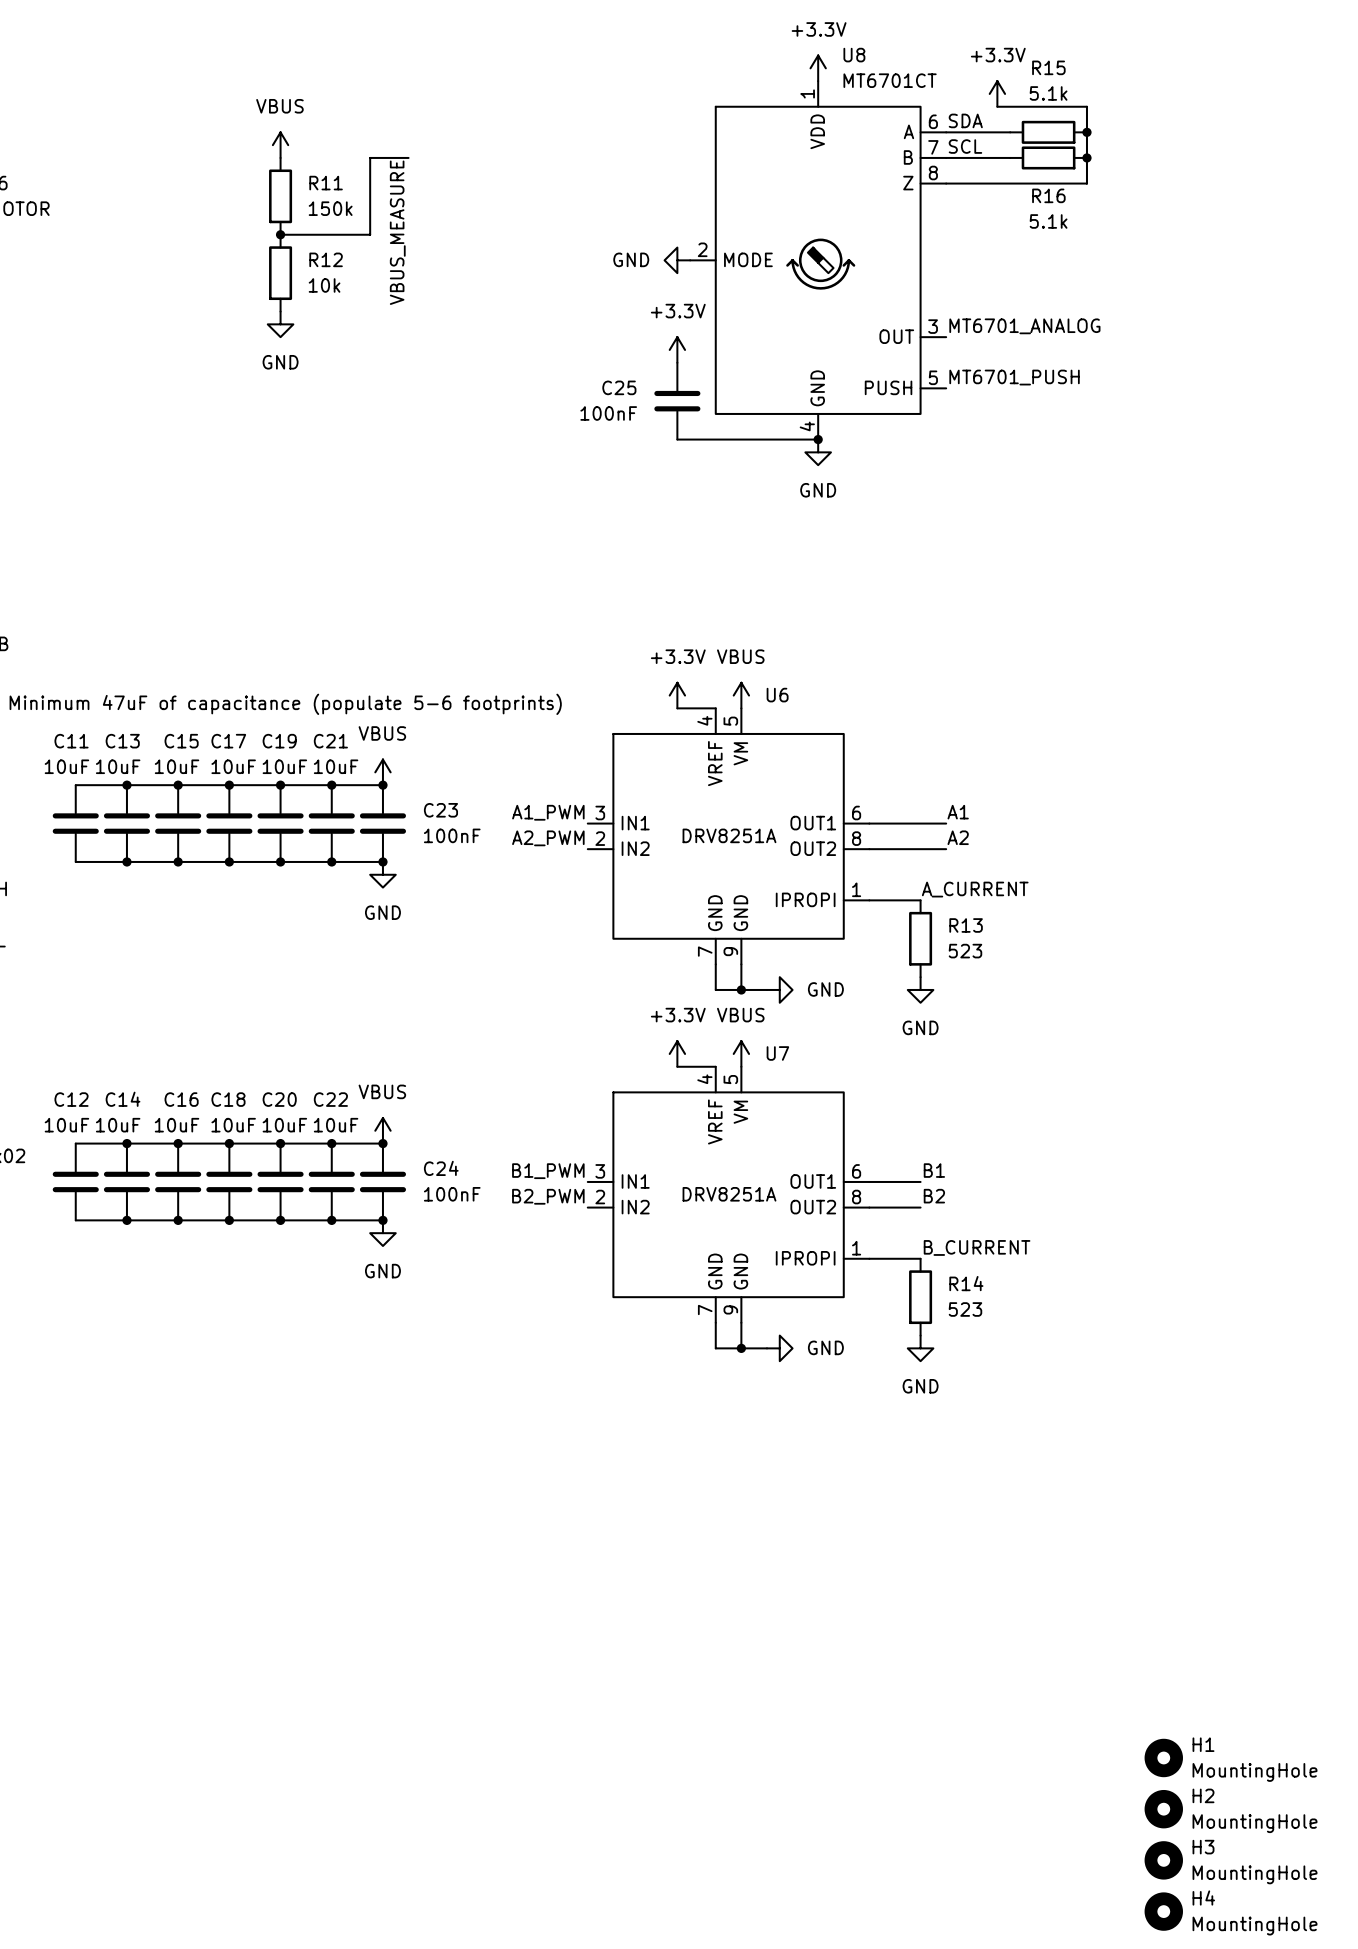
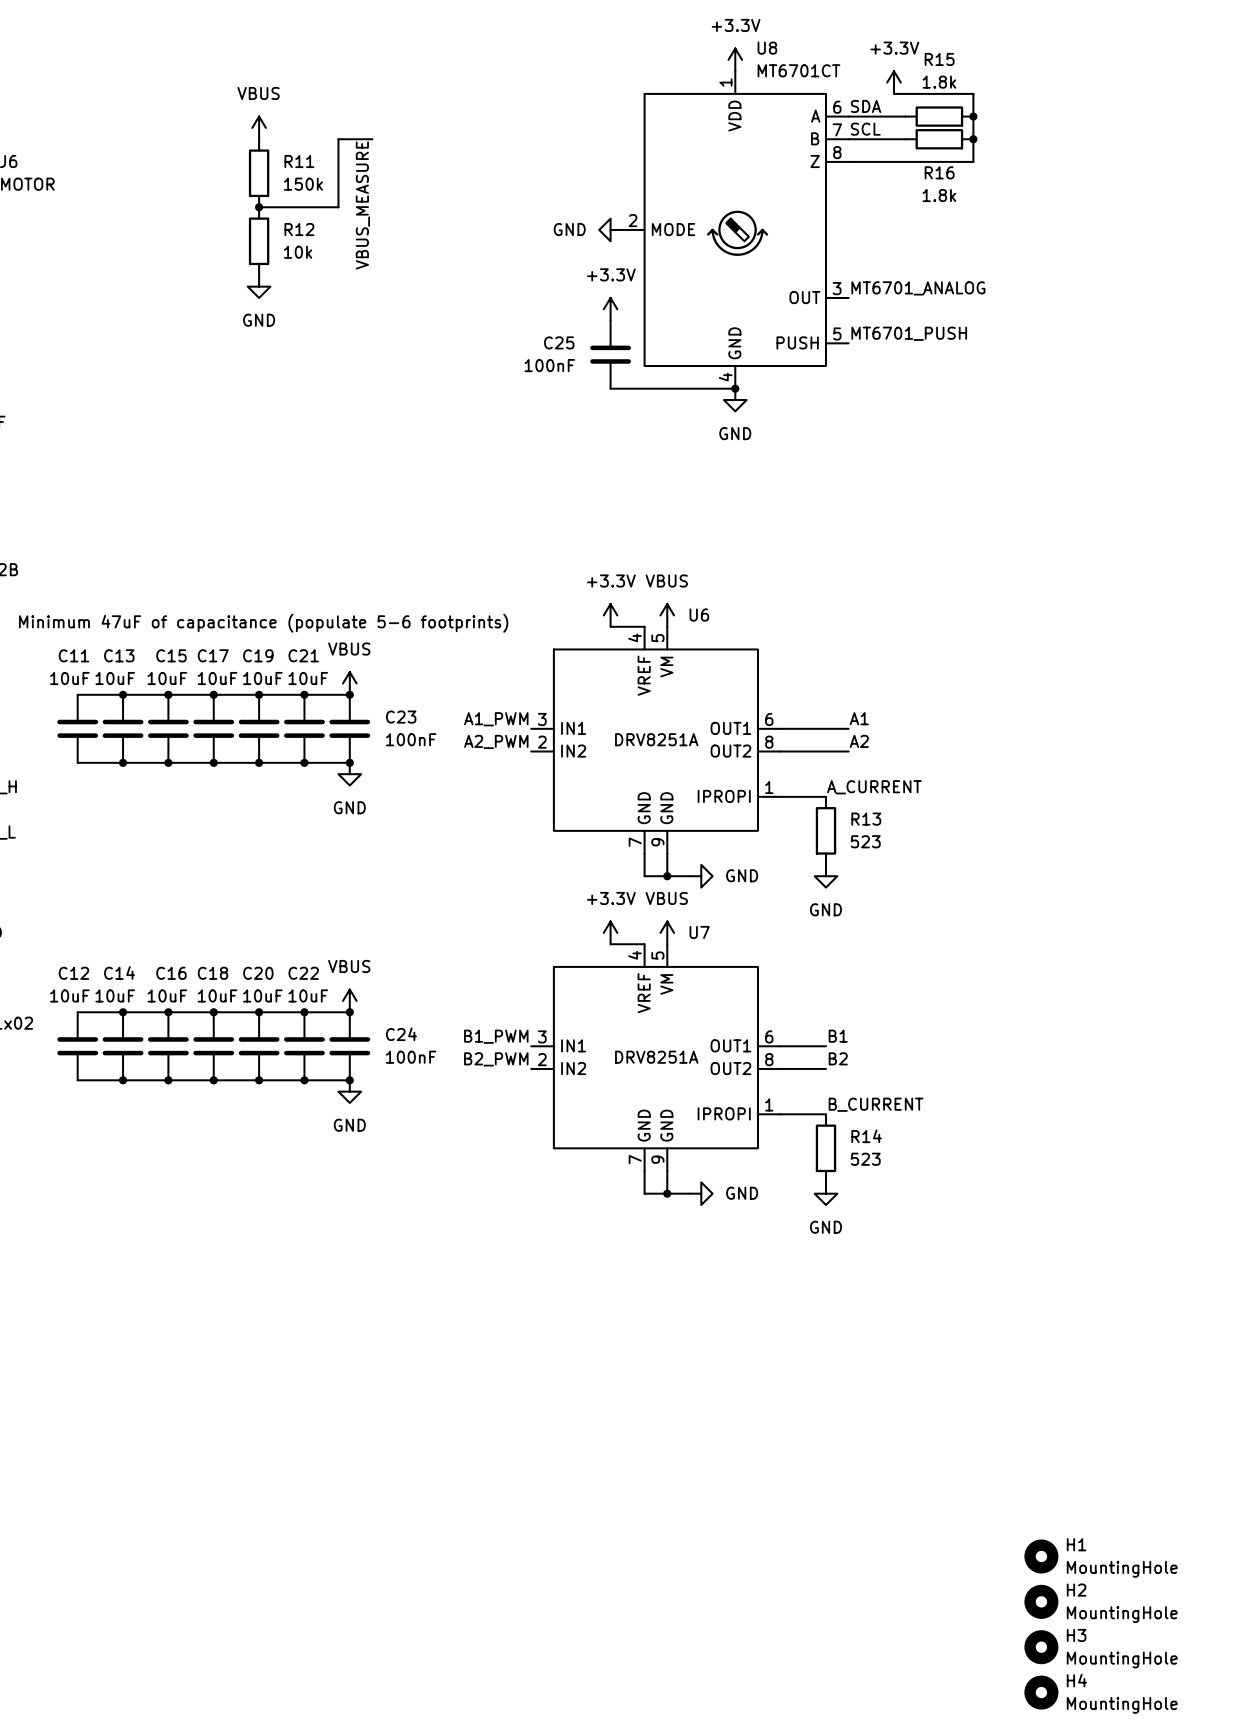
R15 value: 5.1k (1048, 93) -> 1.8k (939, 82)
R16 value: 5.1k (1048, 221) -> 1.8k (939, 195)

